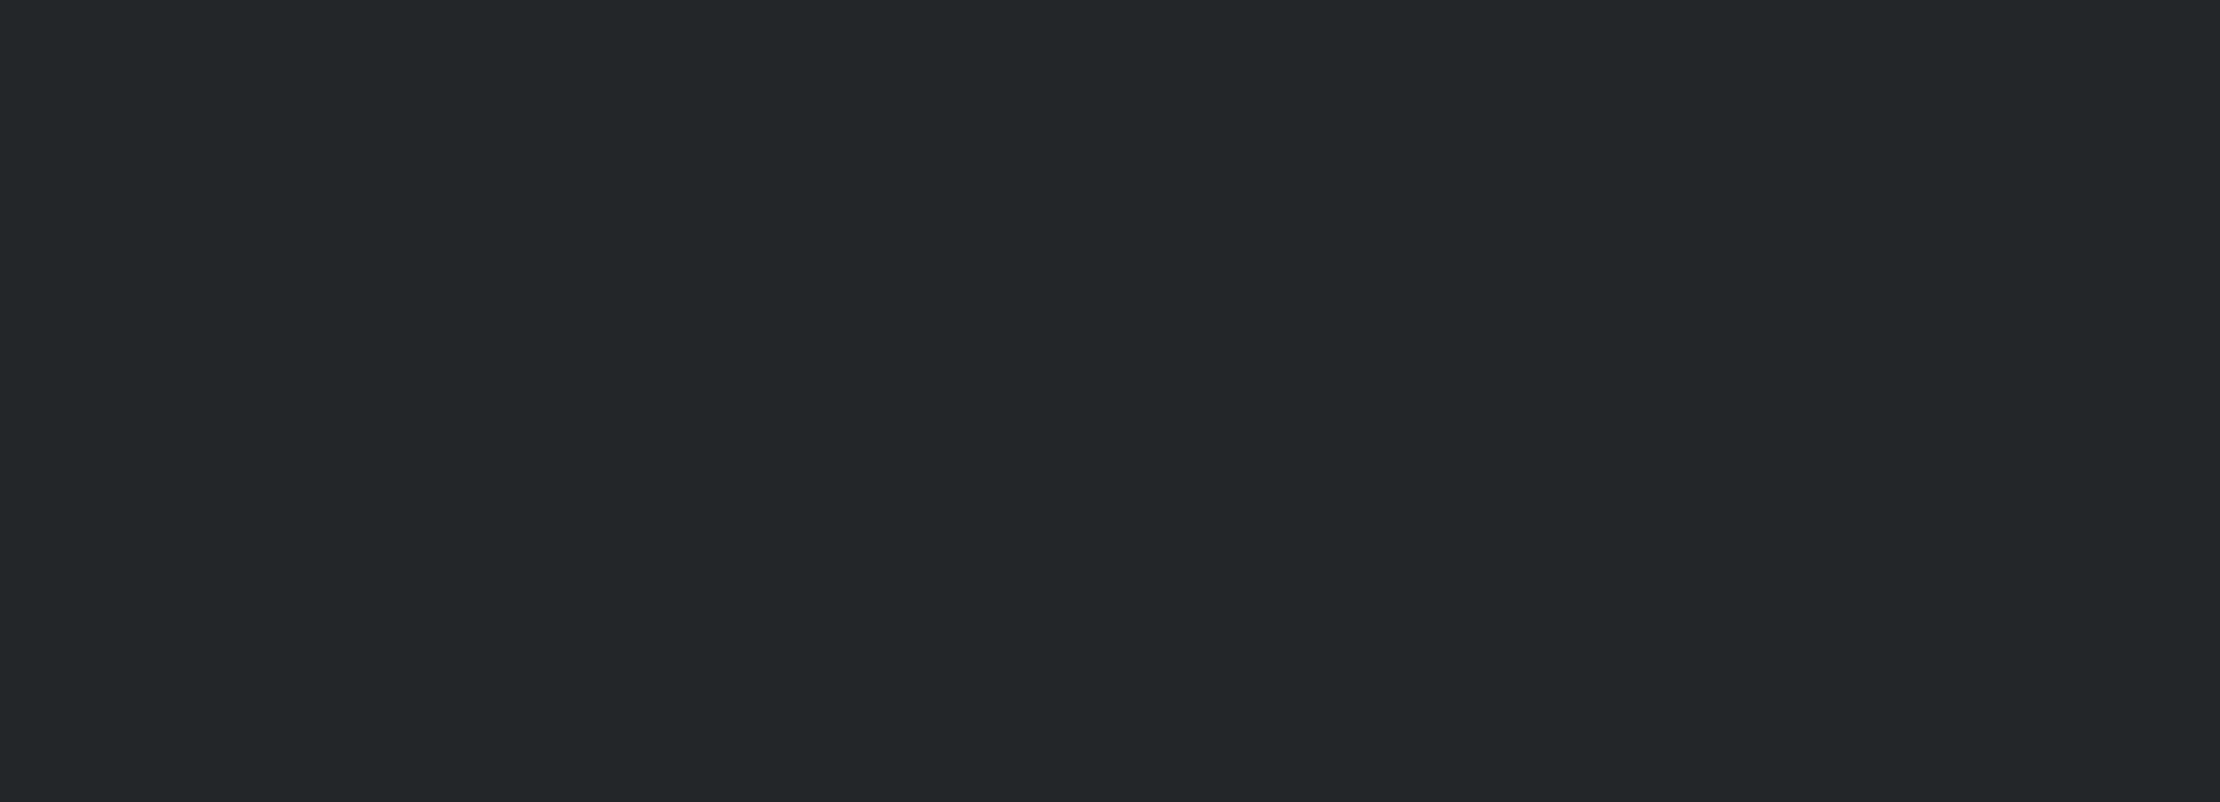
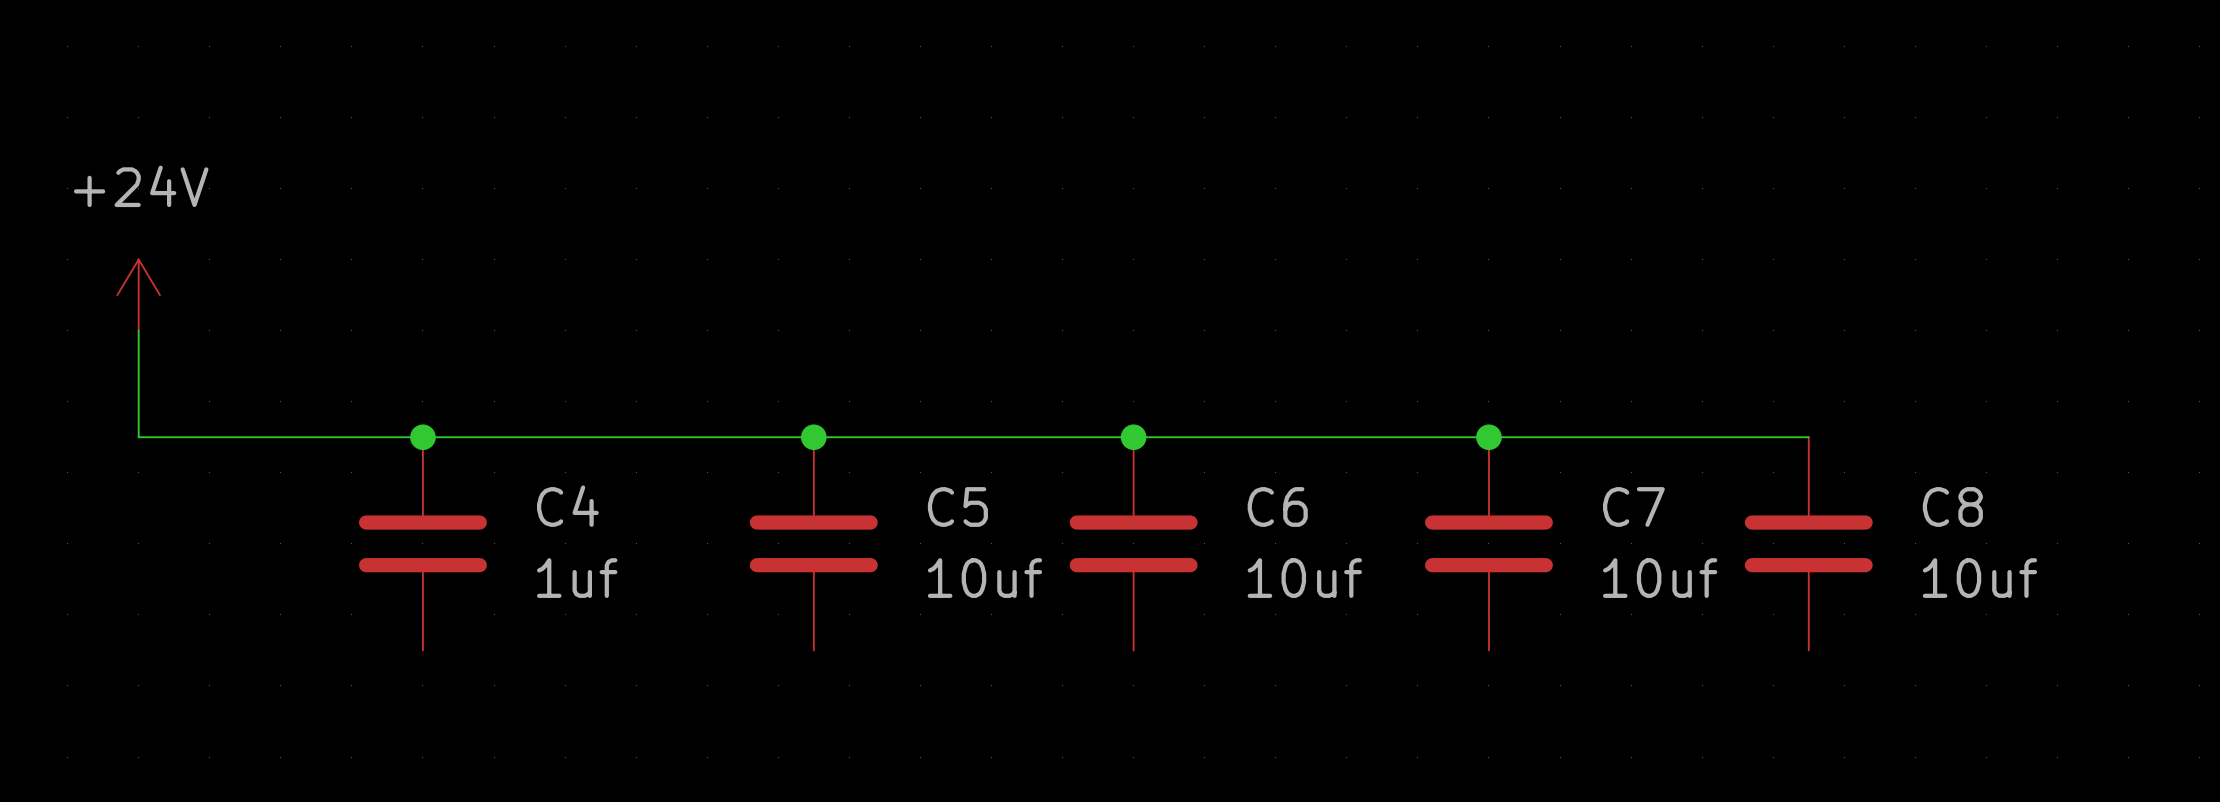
power symbol: none -> +24V (138, 295)
wire: none -> (138, 330) (138, 437) (1808, 437)
junction: none -> (422, 437)
junction: none -> (813, 437)
junction: none -> (1133, 437)
junction: none -> (1488, 437)
C4: none -> 1uf (422, 543)
C5: none -> 10uf (813, 543)
C6: none -> 10uf (1133, 543)
C7: none -> 10uf (1488, 543)
C8: none -> 10uf (1808, 543)

